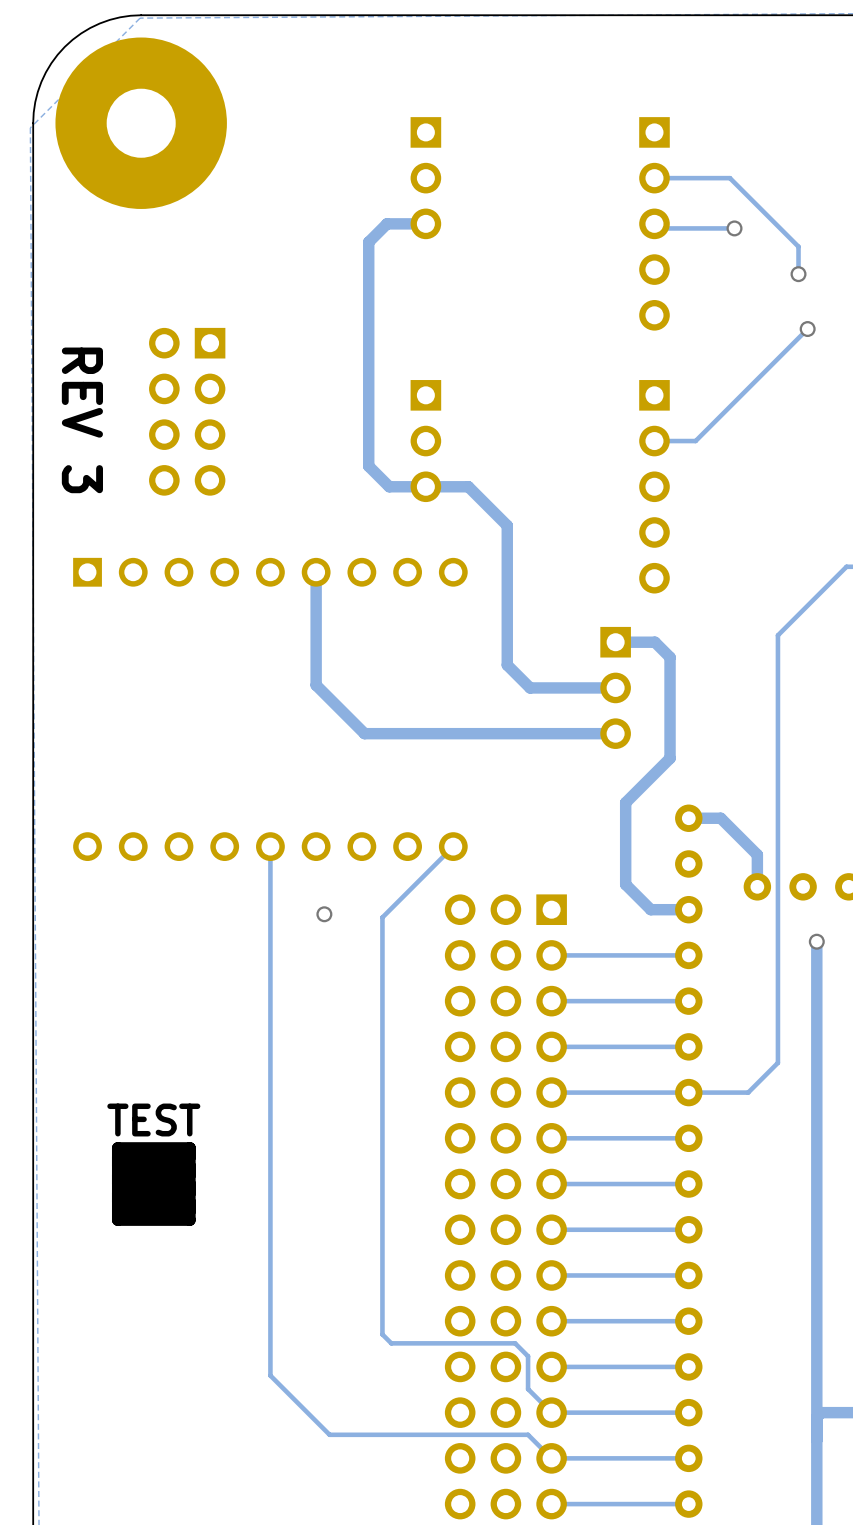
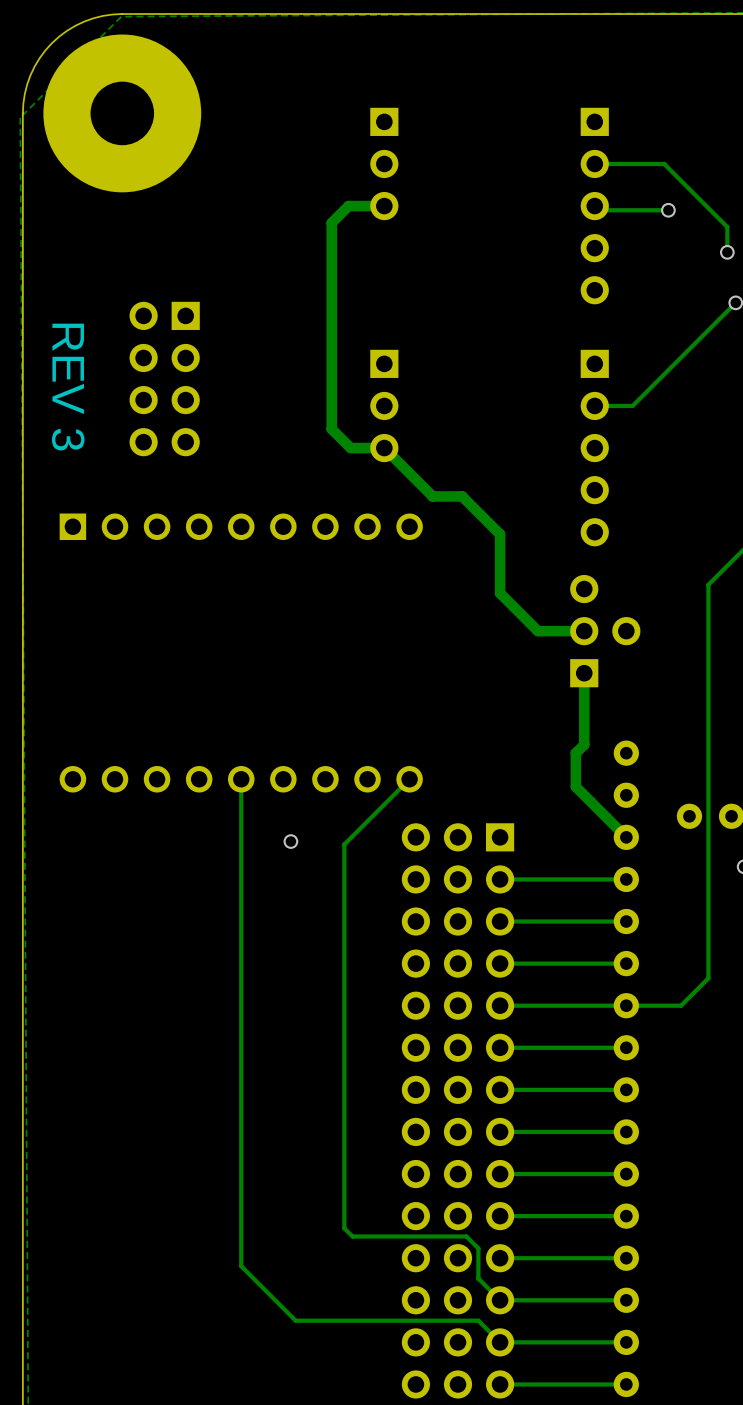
track: (425, 486) (468, 486) (507, 525) (507, 665) (530, 687) (615, 687) -> (384, 448) (432, 496) (462, 496) (500, 534) (500, 593) (537, 631) (584, 631)
track: (316, 572) (316, 685) (364, 733) (615, 733) -> none
track: (615, 642) (654, 642) (670, 657) (670, 758) (625, 802) (625, 884) (650, 909) (688, 909) -> (584, 673) (584, 744) (575, 753) (575, 786) (626, 837)
part: none -> (605, 631)
part: (615, 687) -> none
track: (688, 818) (720, 818) (757, 854) (757, 886) -> none
TEST: (153, 1184) -> none

